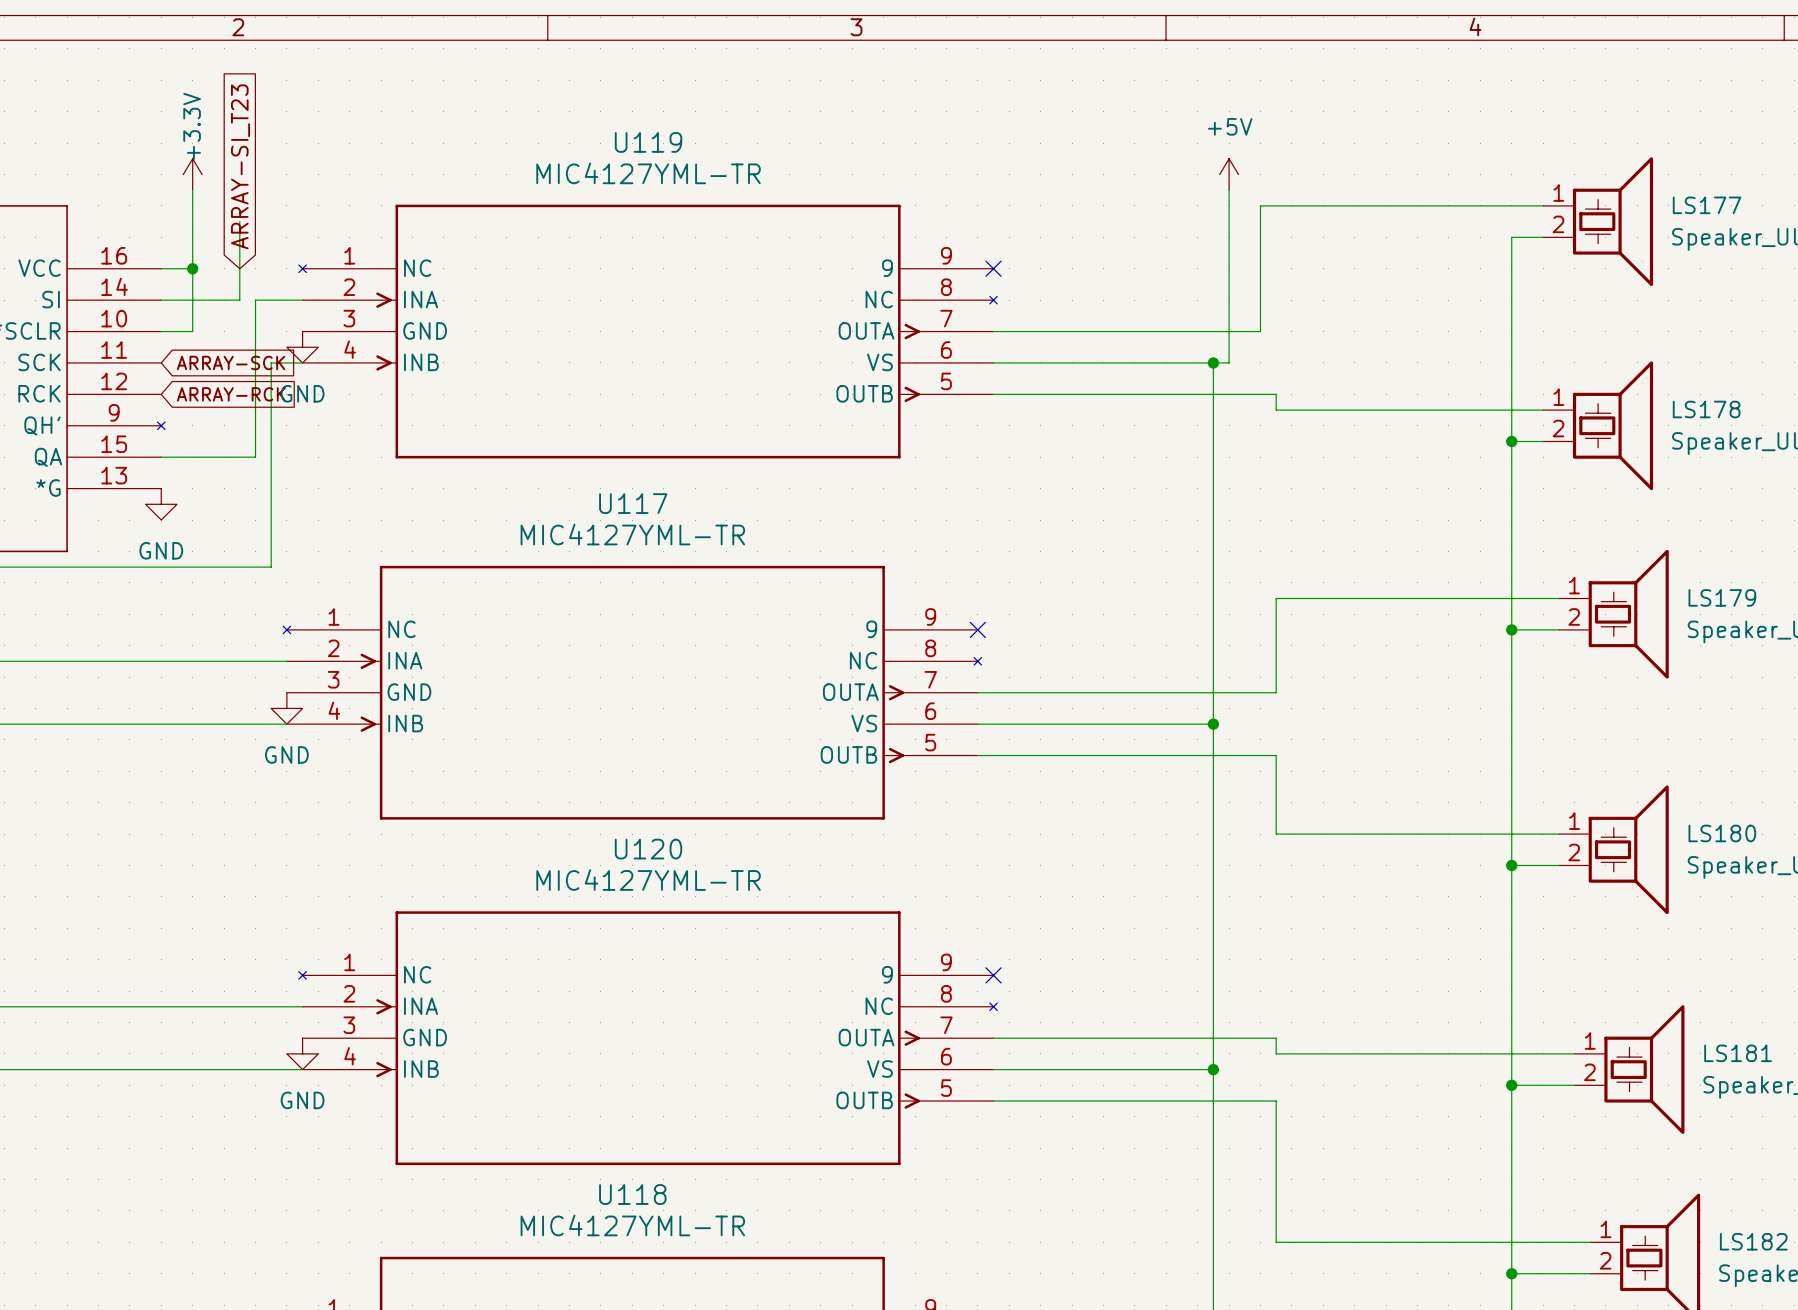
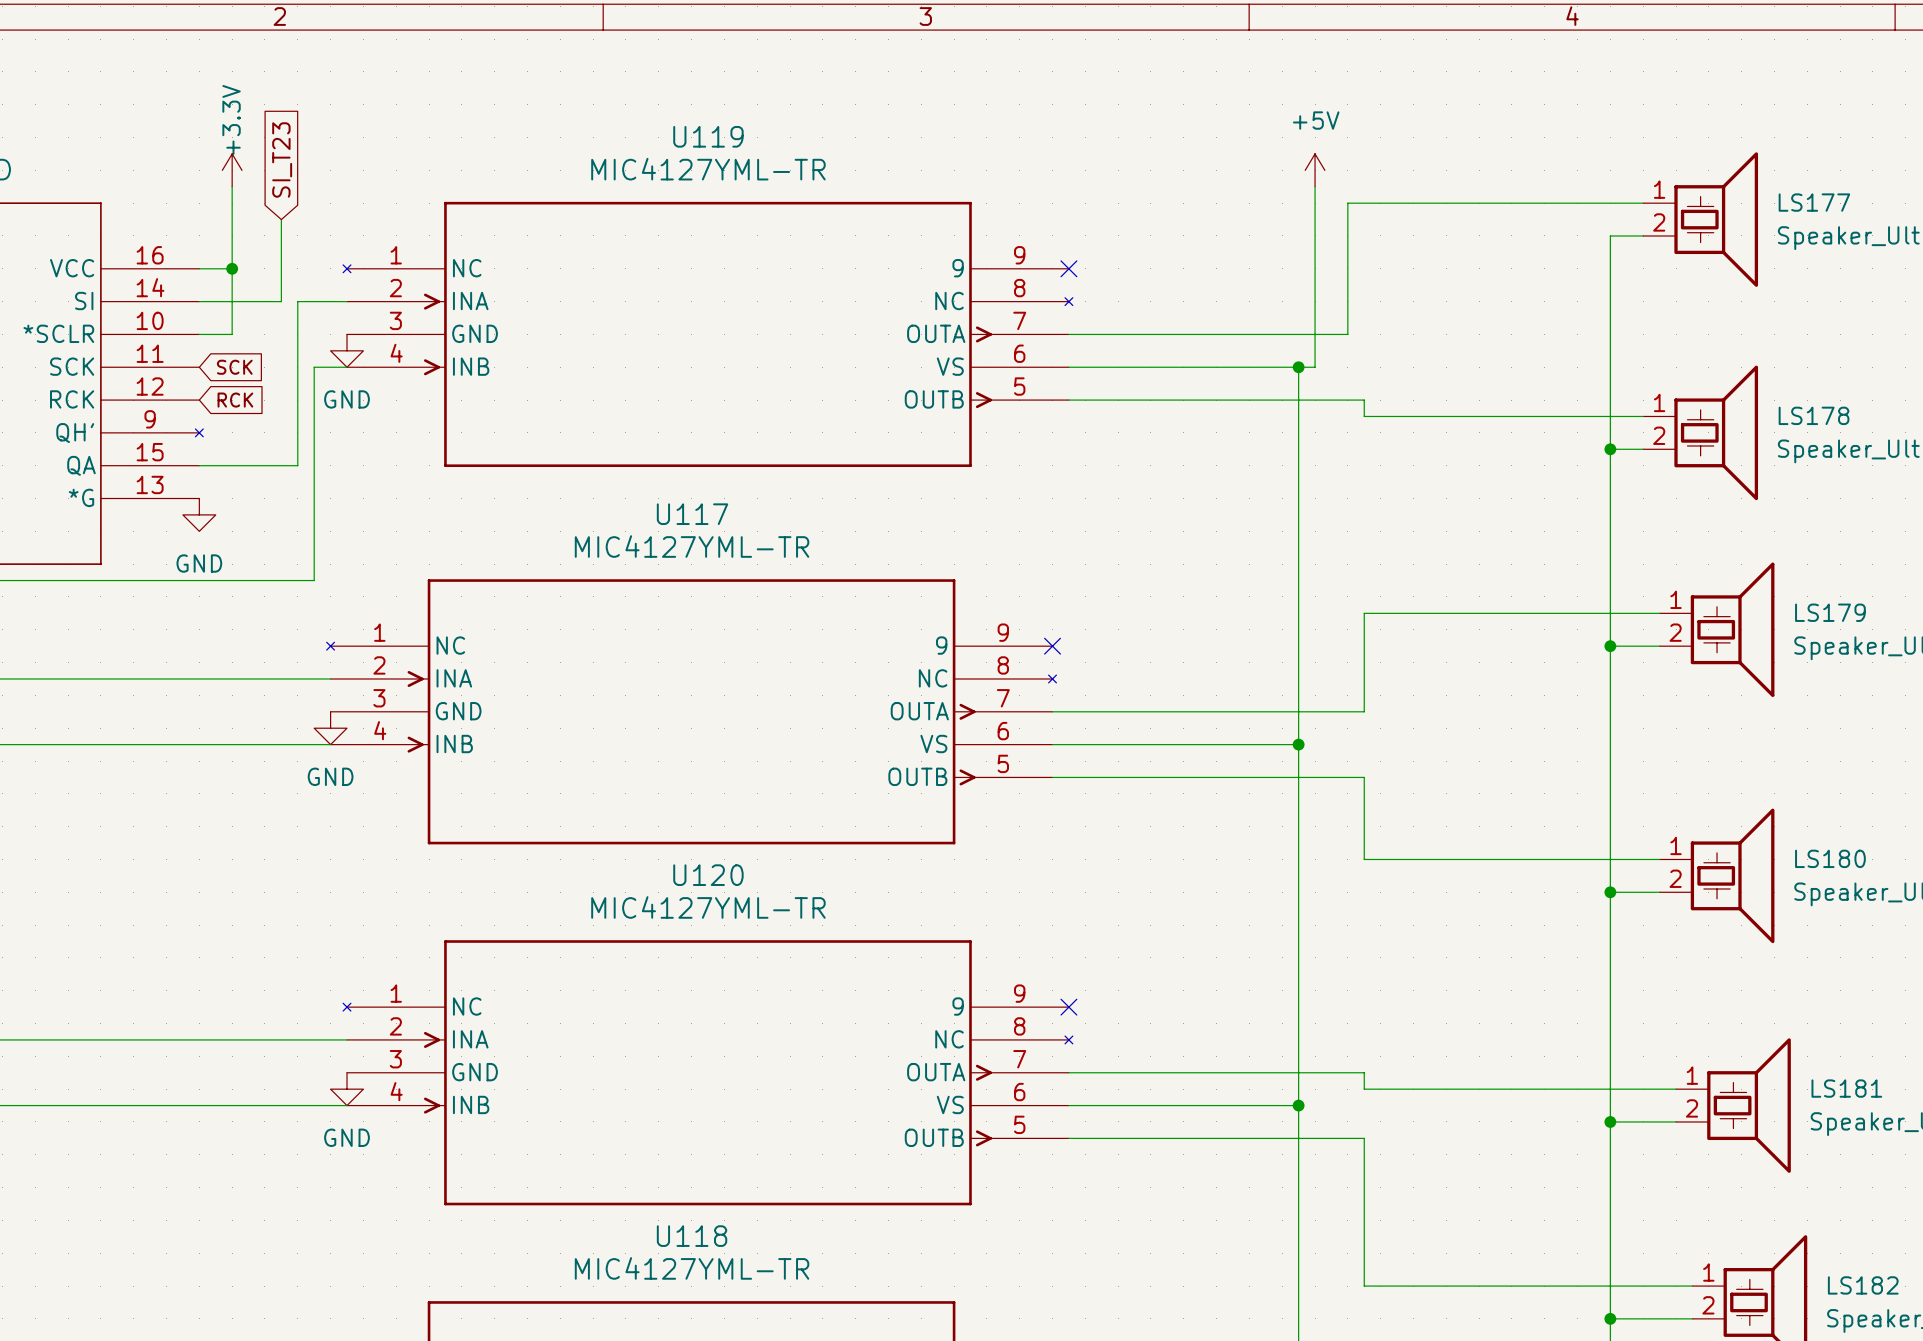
global label: ARRAY-SI_T23 (240, 166) -> SI_T23 (282, 159)
global label: ARRAY-SCK (231, 362) -> SCK (234, 367)
global label: ARRAY-RCK (231, 394) -> RCK (235, 400)

